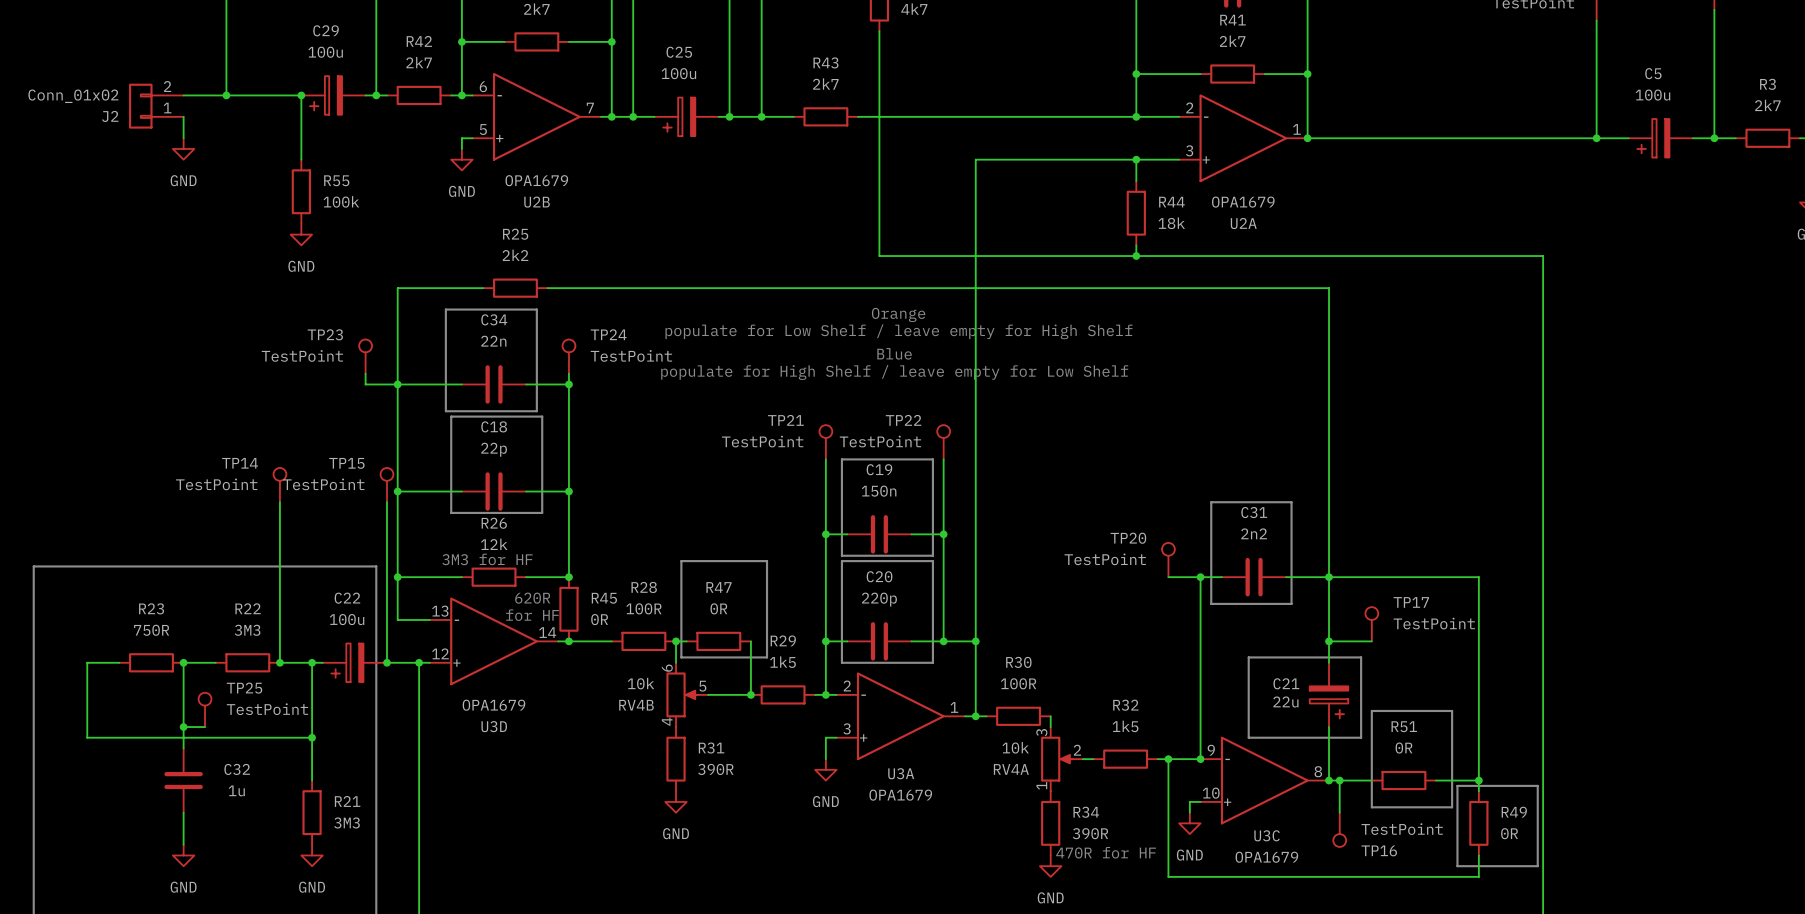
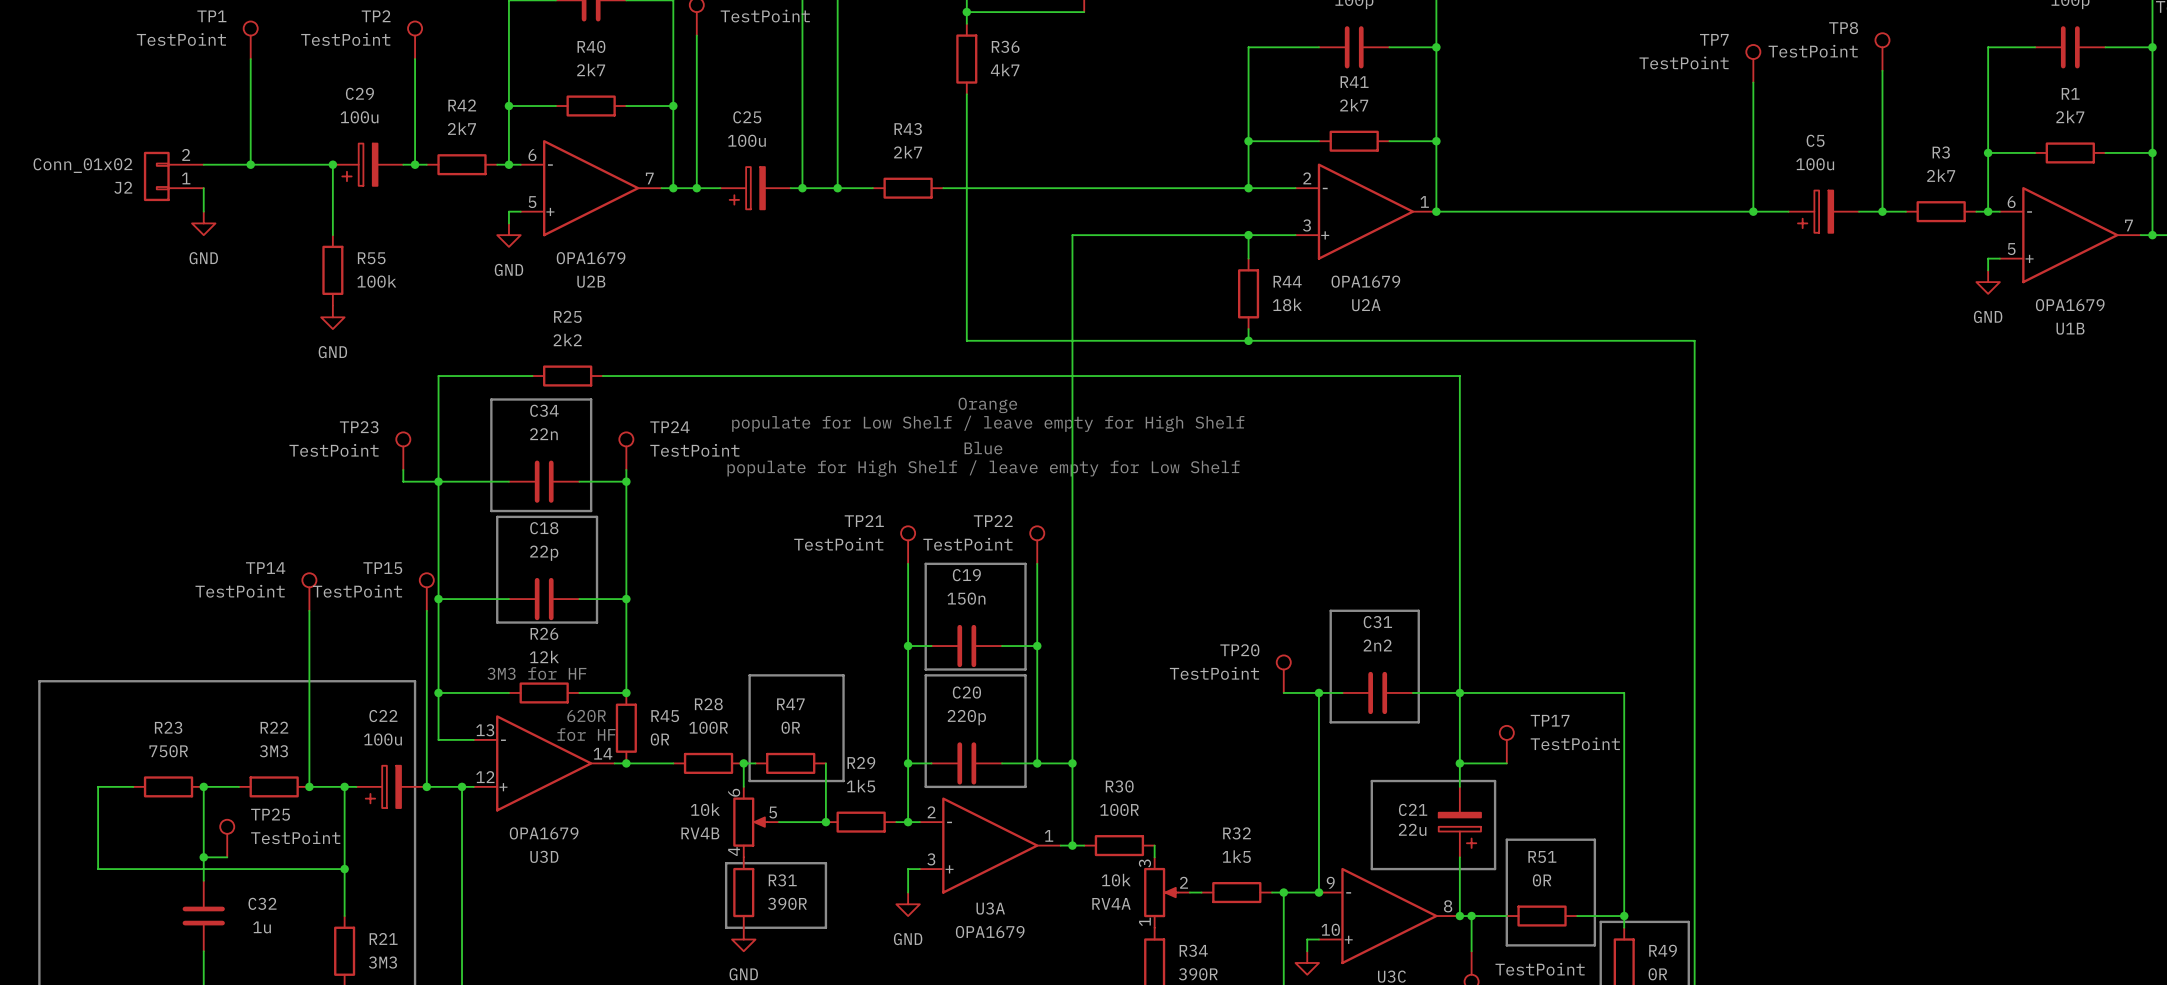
line: none -> (726, 863) (825, 863) (825, 927) (726, 927) (726, 863)

